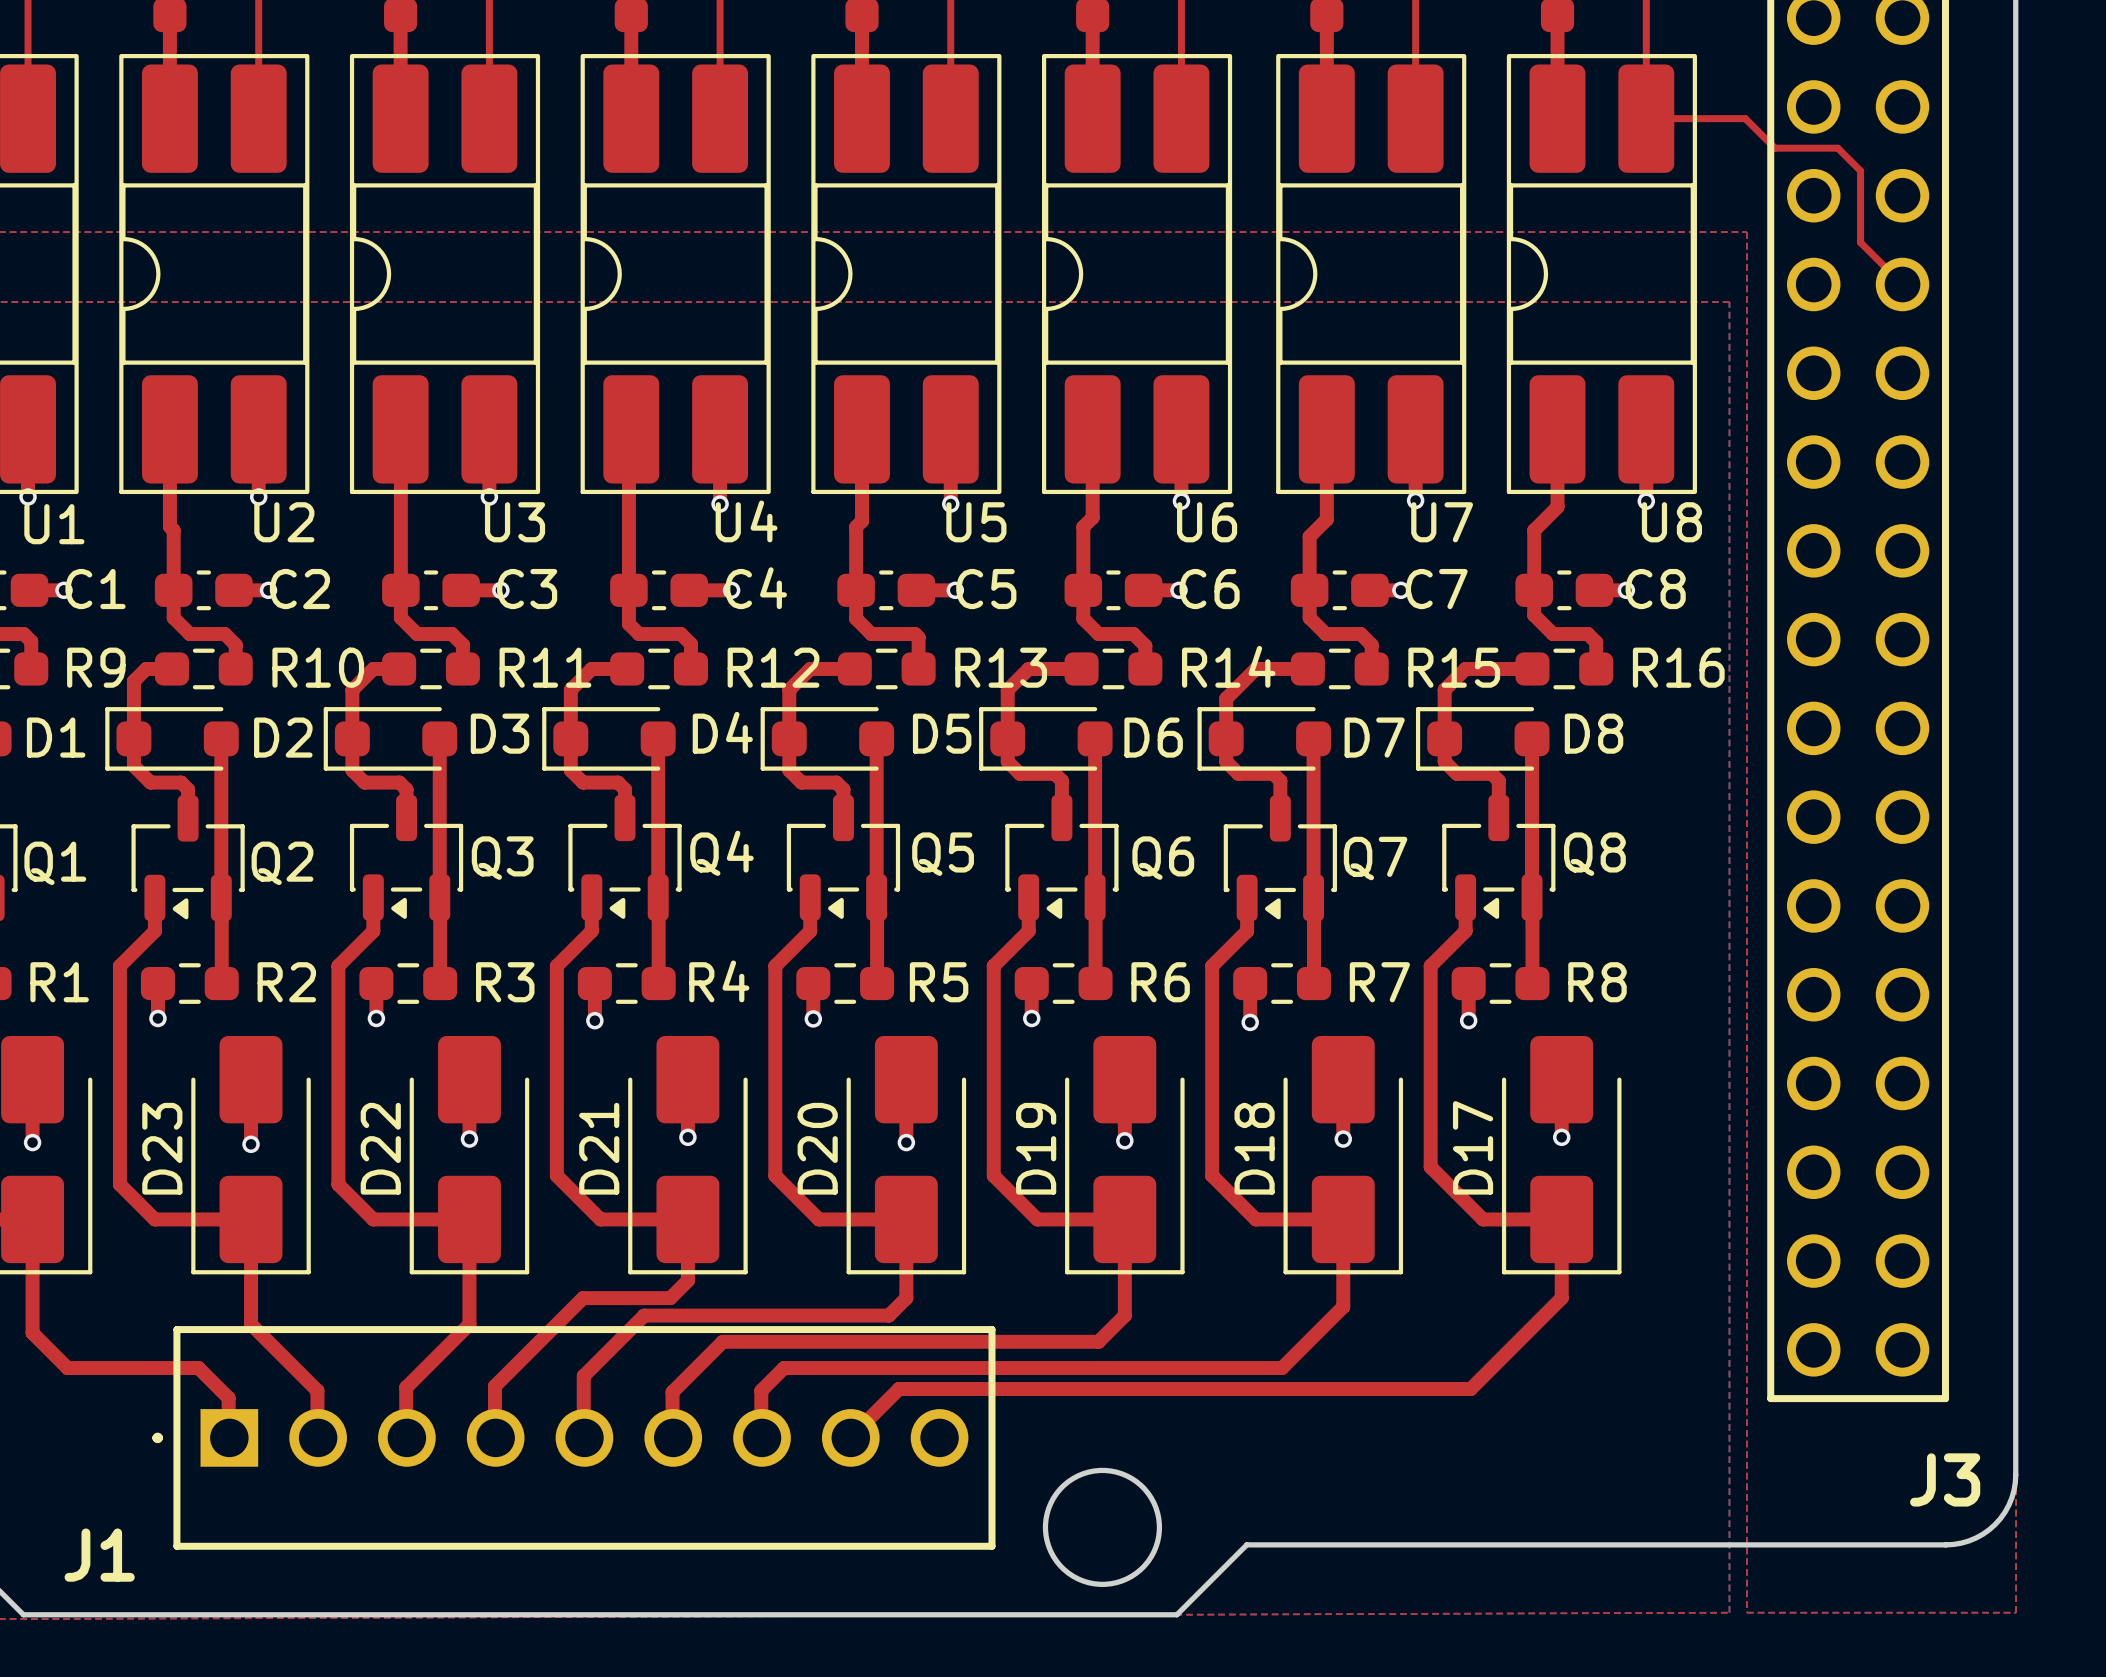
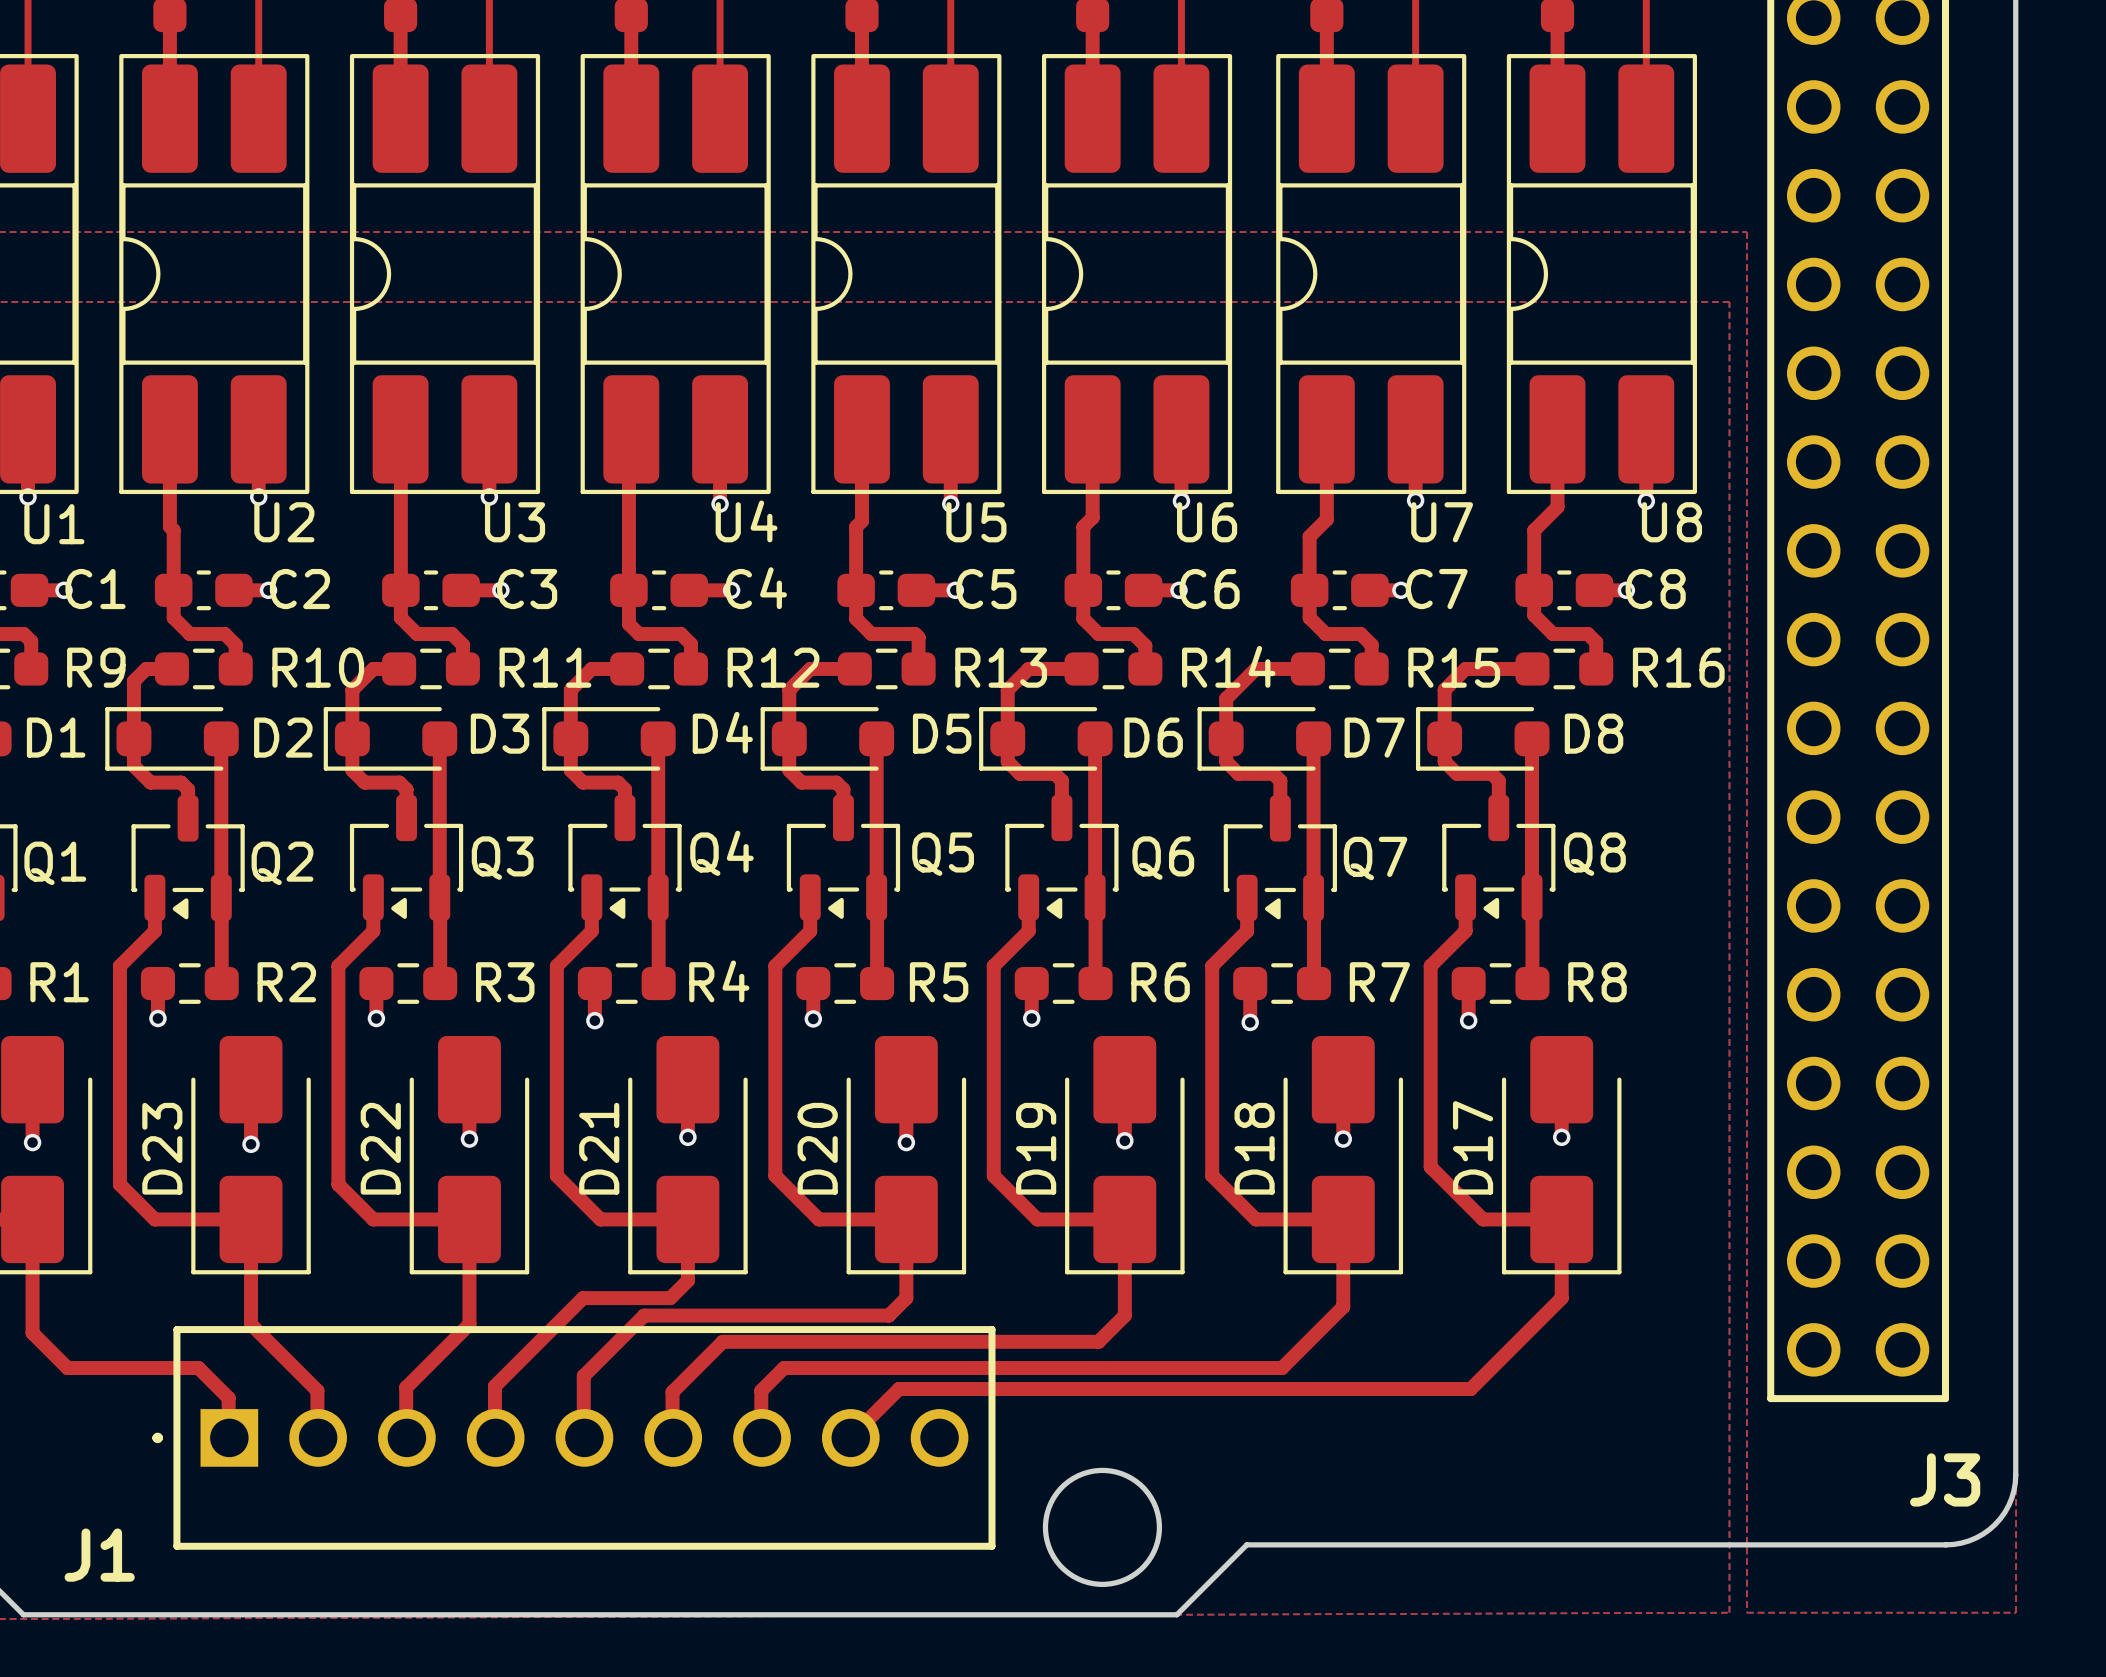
top track: (1646, 118) (1745, 118) (1774, 148) (1837, 148) (1860, 170) (1860, 242) (1902, 284) -> none

